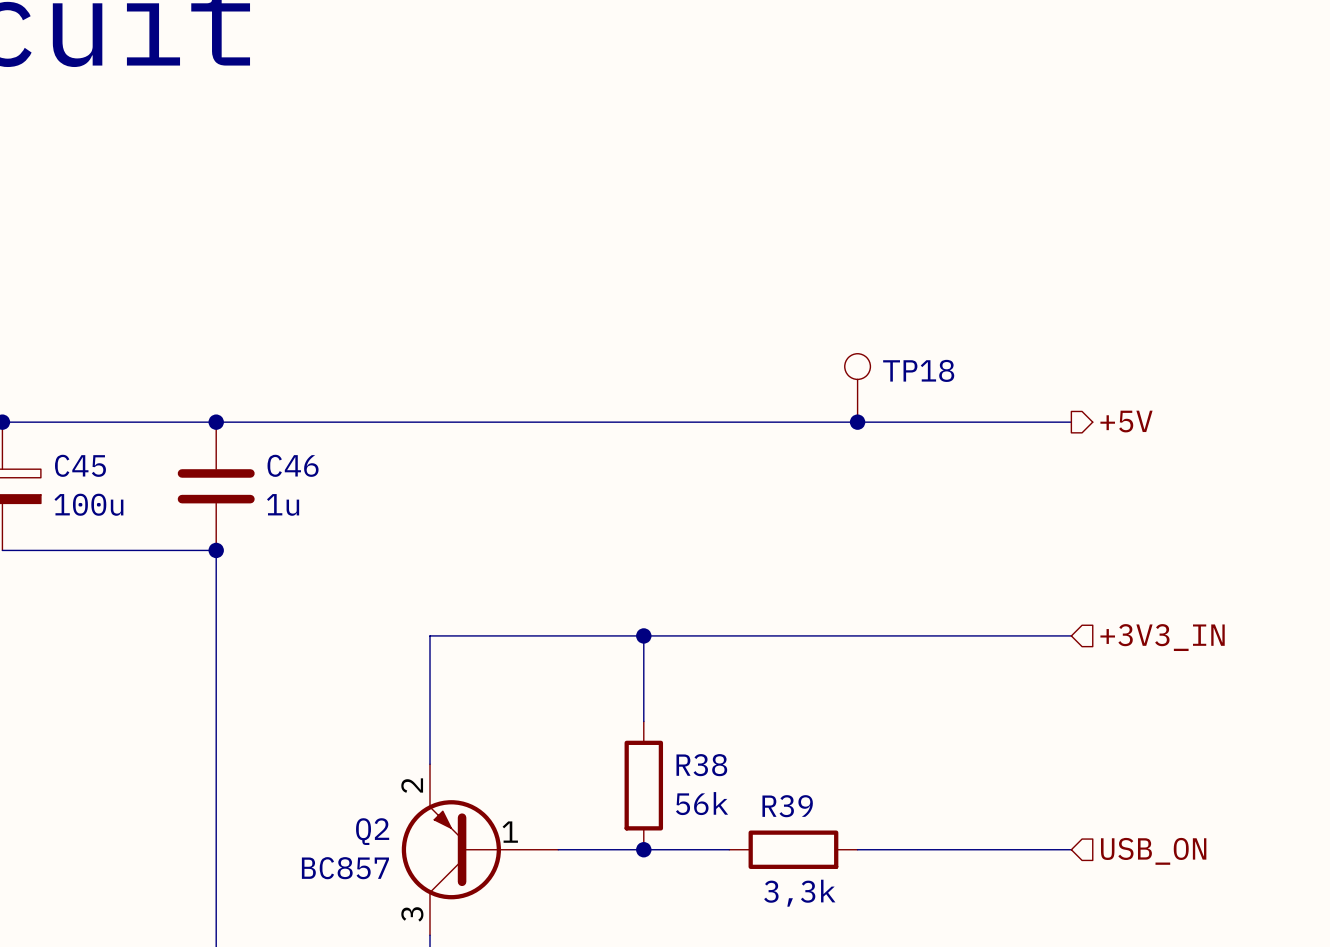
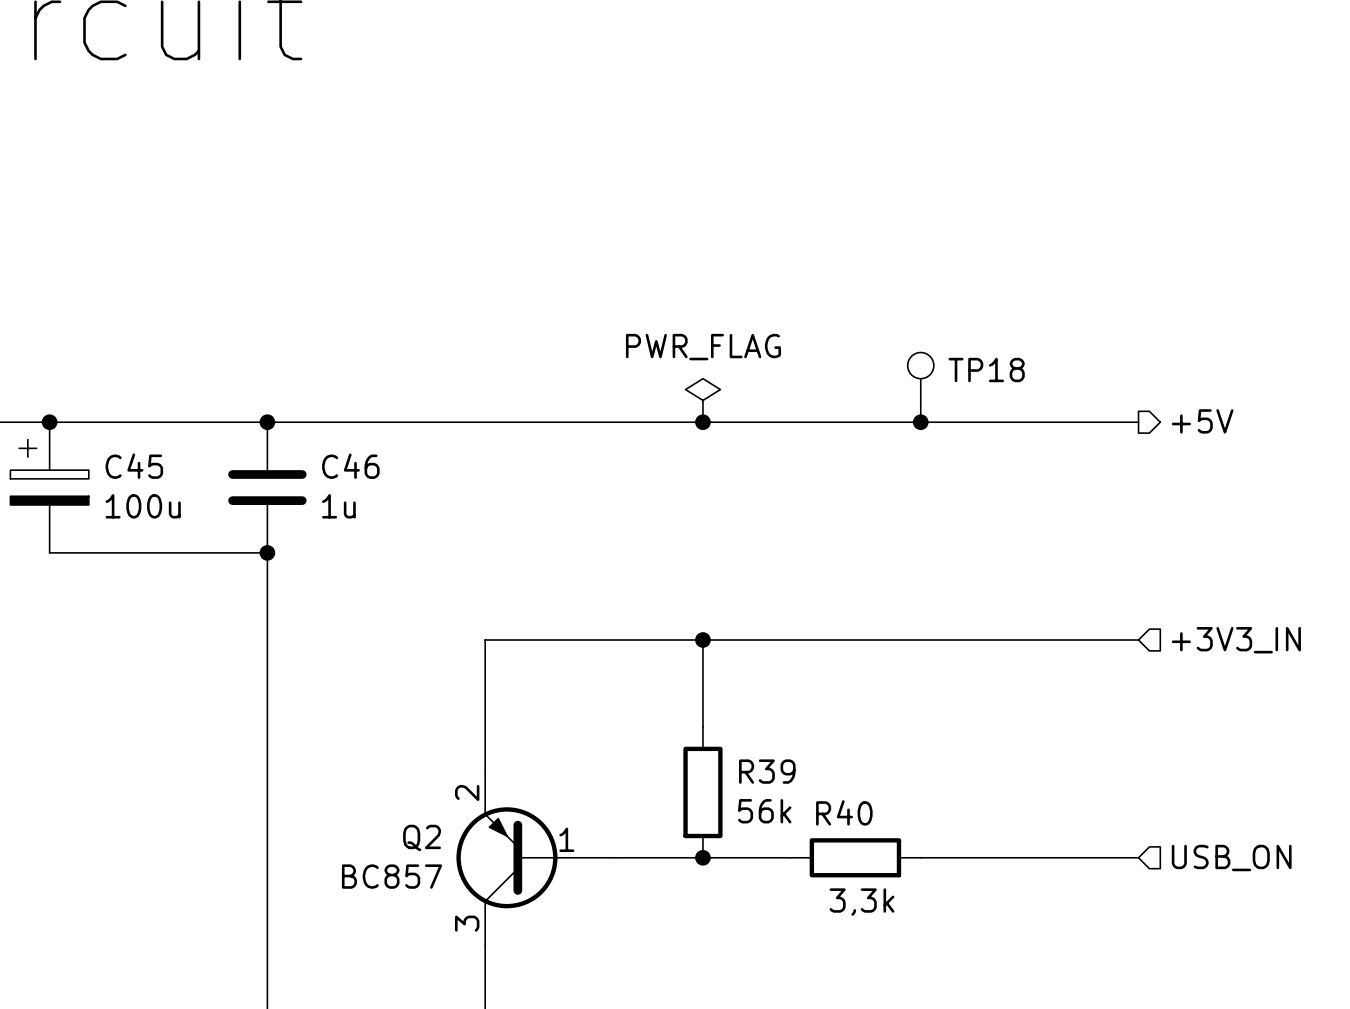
power symbol: none -> PWR_FLAG (702, 400)
junction: none -> (702, 422)
R38 name: R38 (701, 765) -> R39 (767, 771)
R39 name: R39 (787, 806) -> R40 (844, 812)

